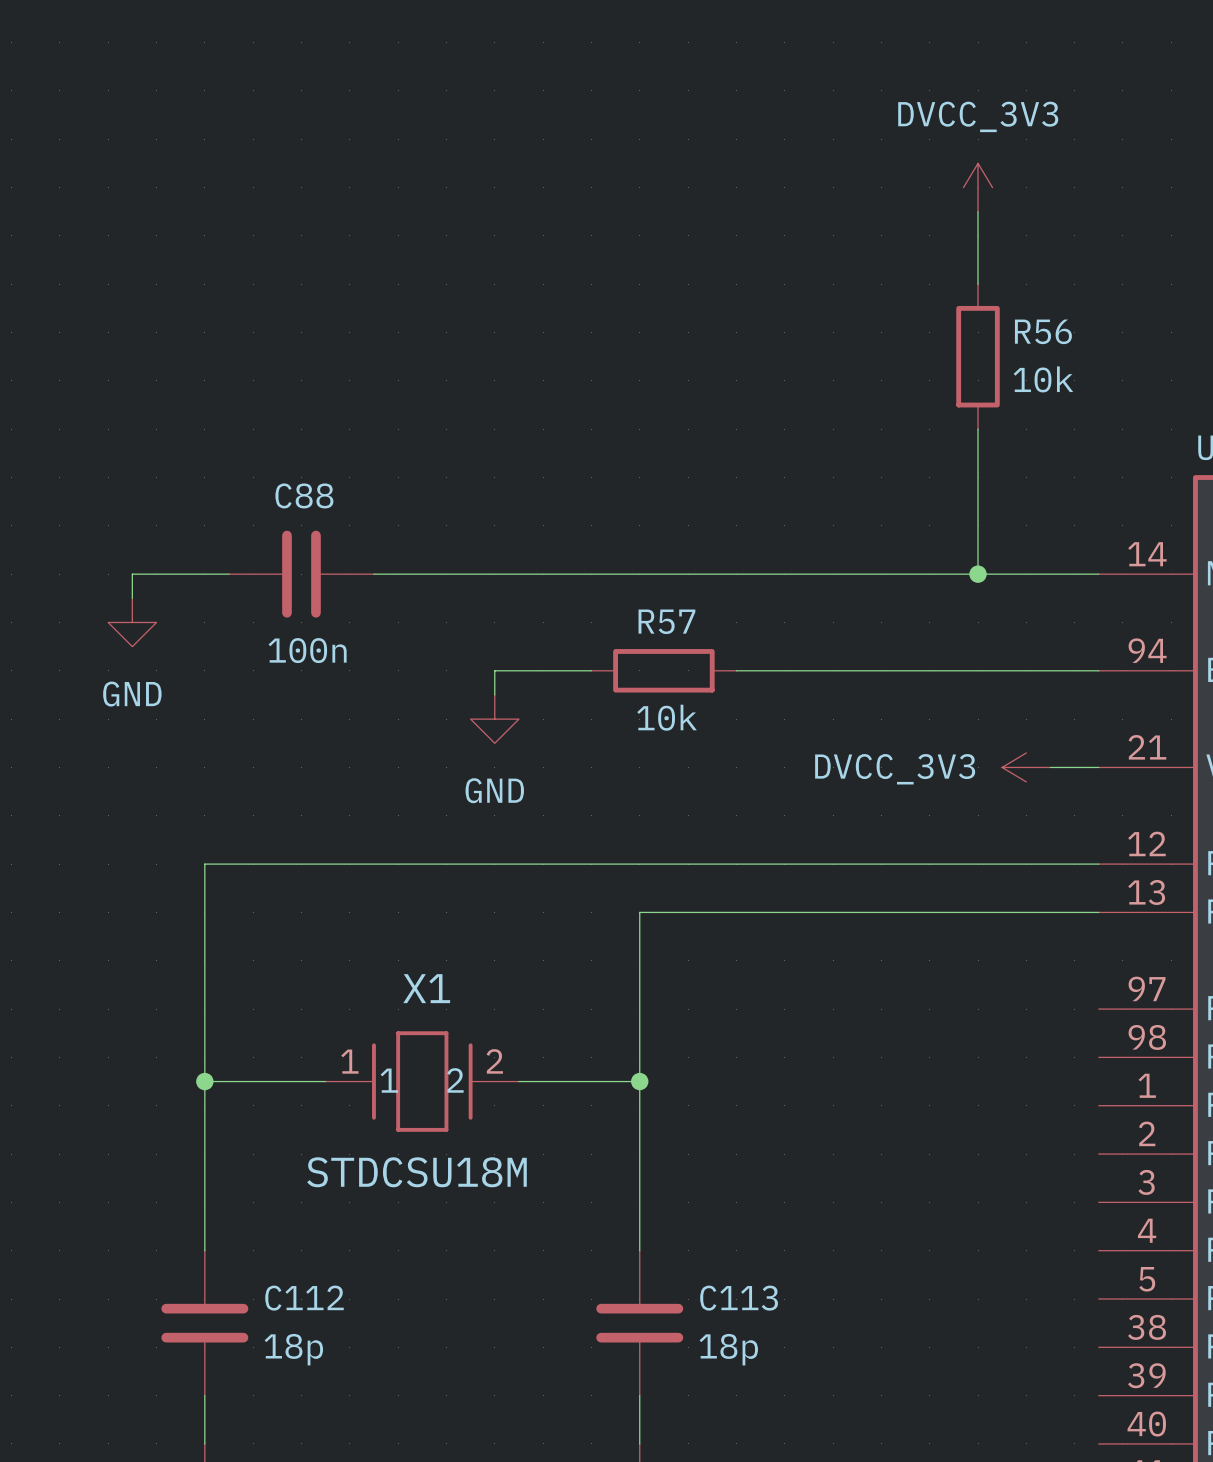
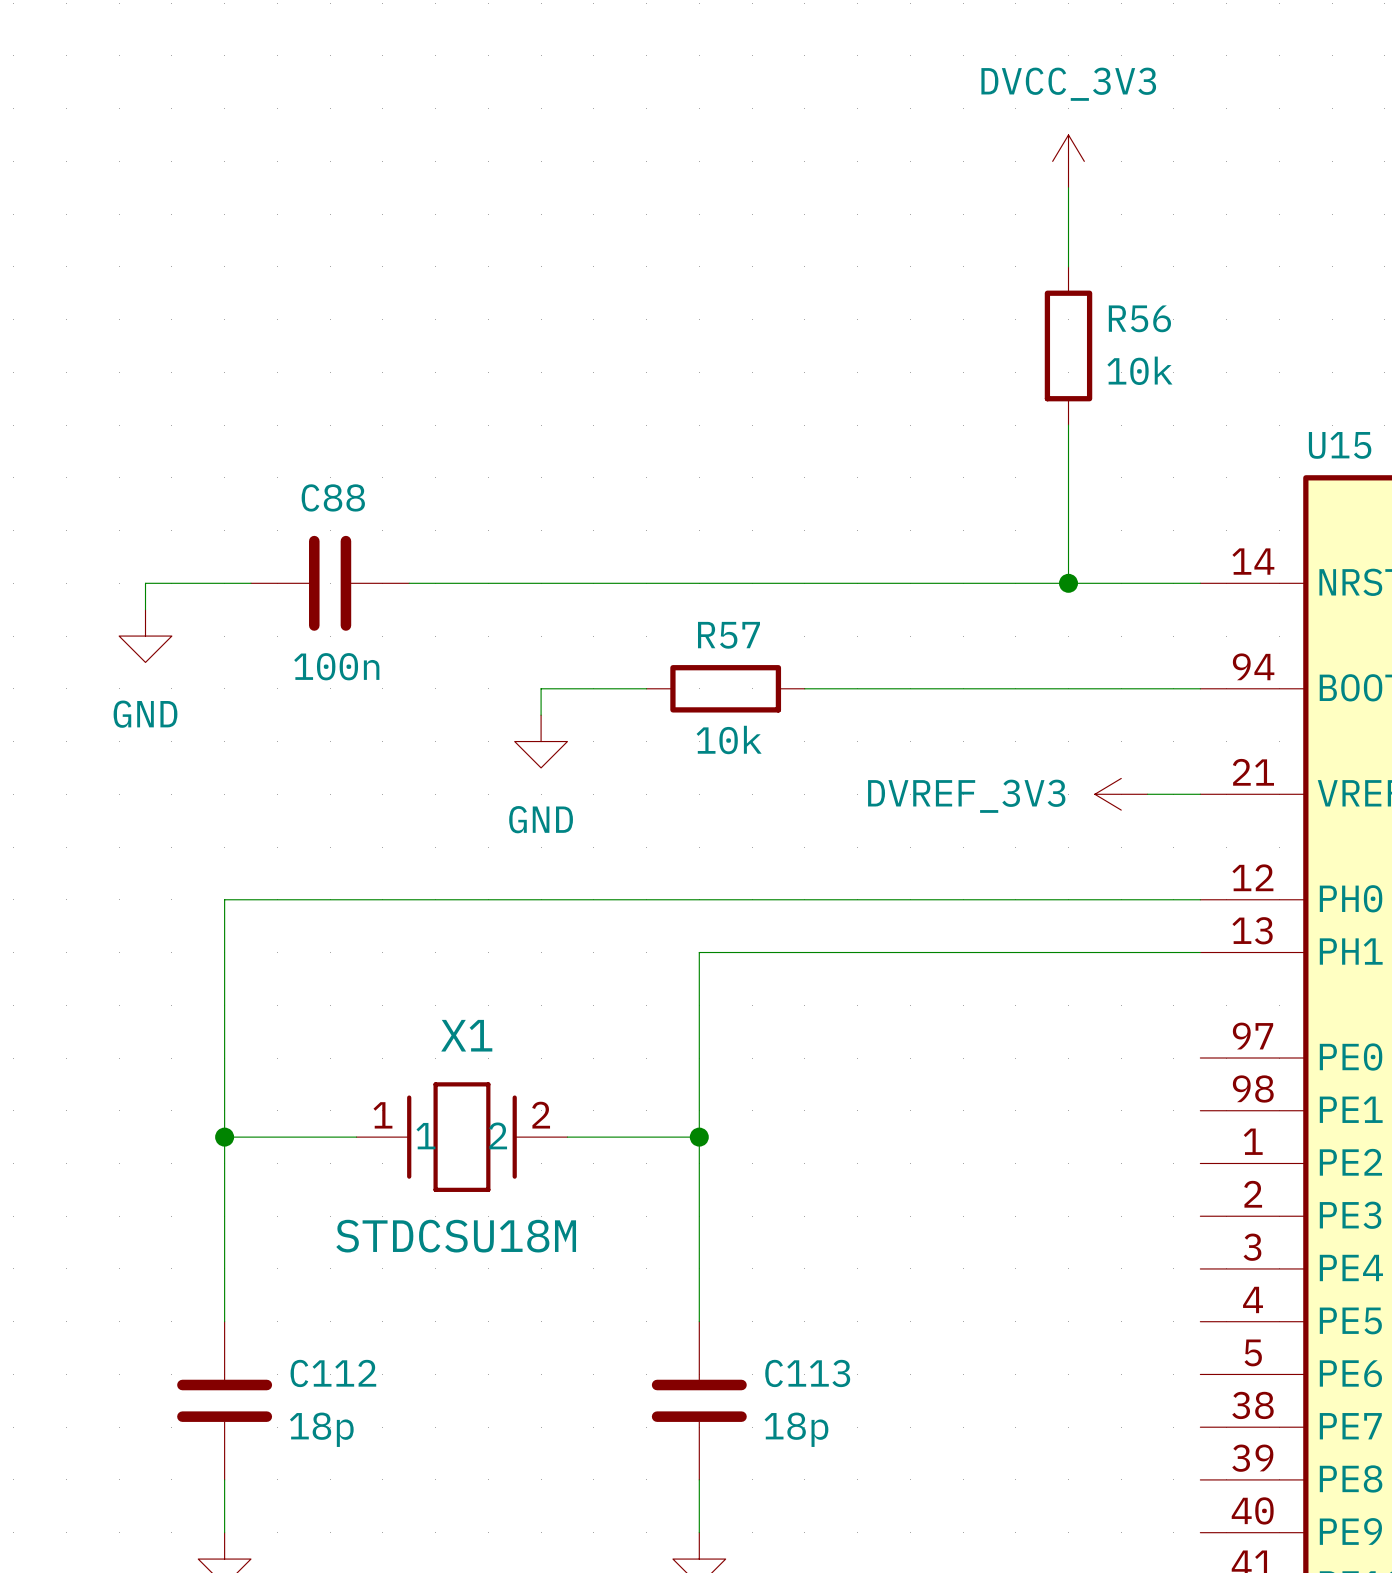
power symbol: DVCC_3V3 (1026, 767) -> DVREF_3V3 (1121, 794)

